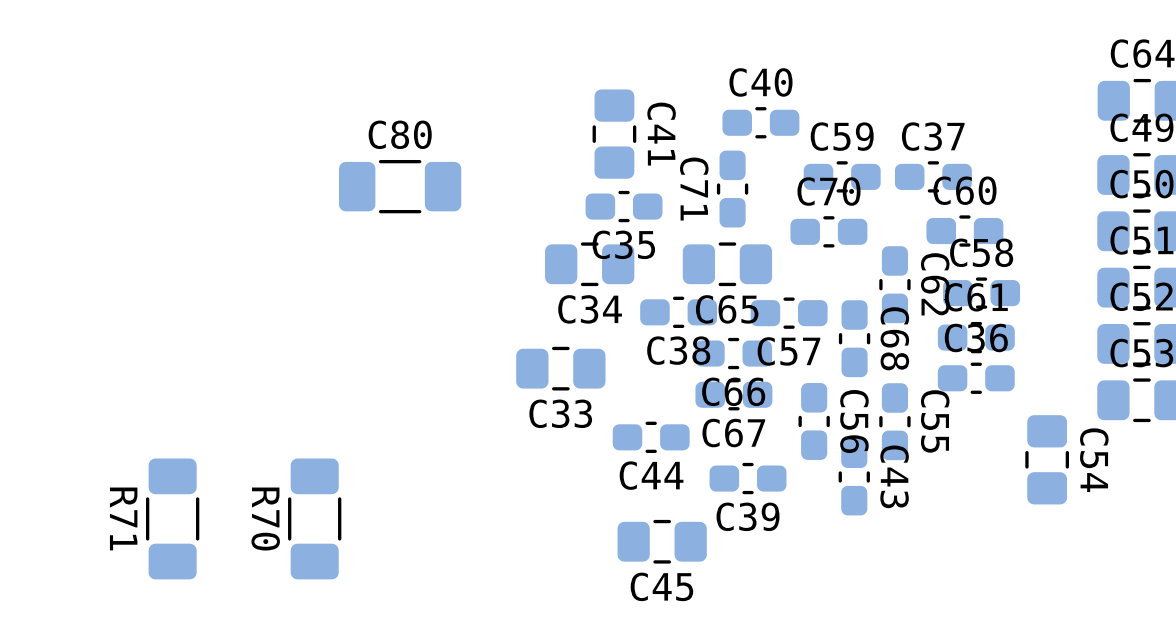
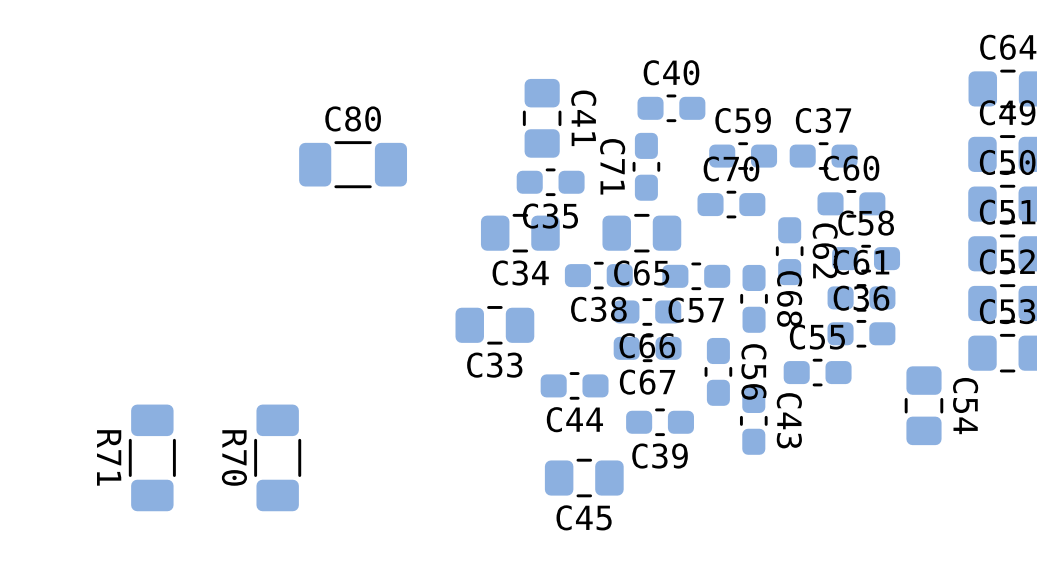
C55 rotation: 0° (894, 421) -> 90° clockwise (817, 372)
C55 name position: C55 (935, 421) -> C55 (817, 337)

